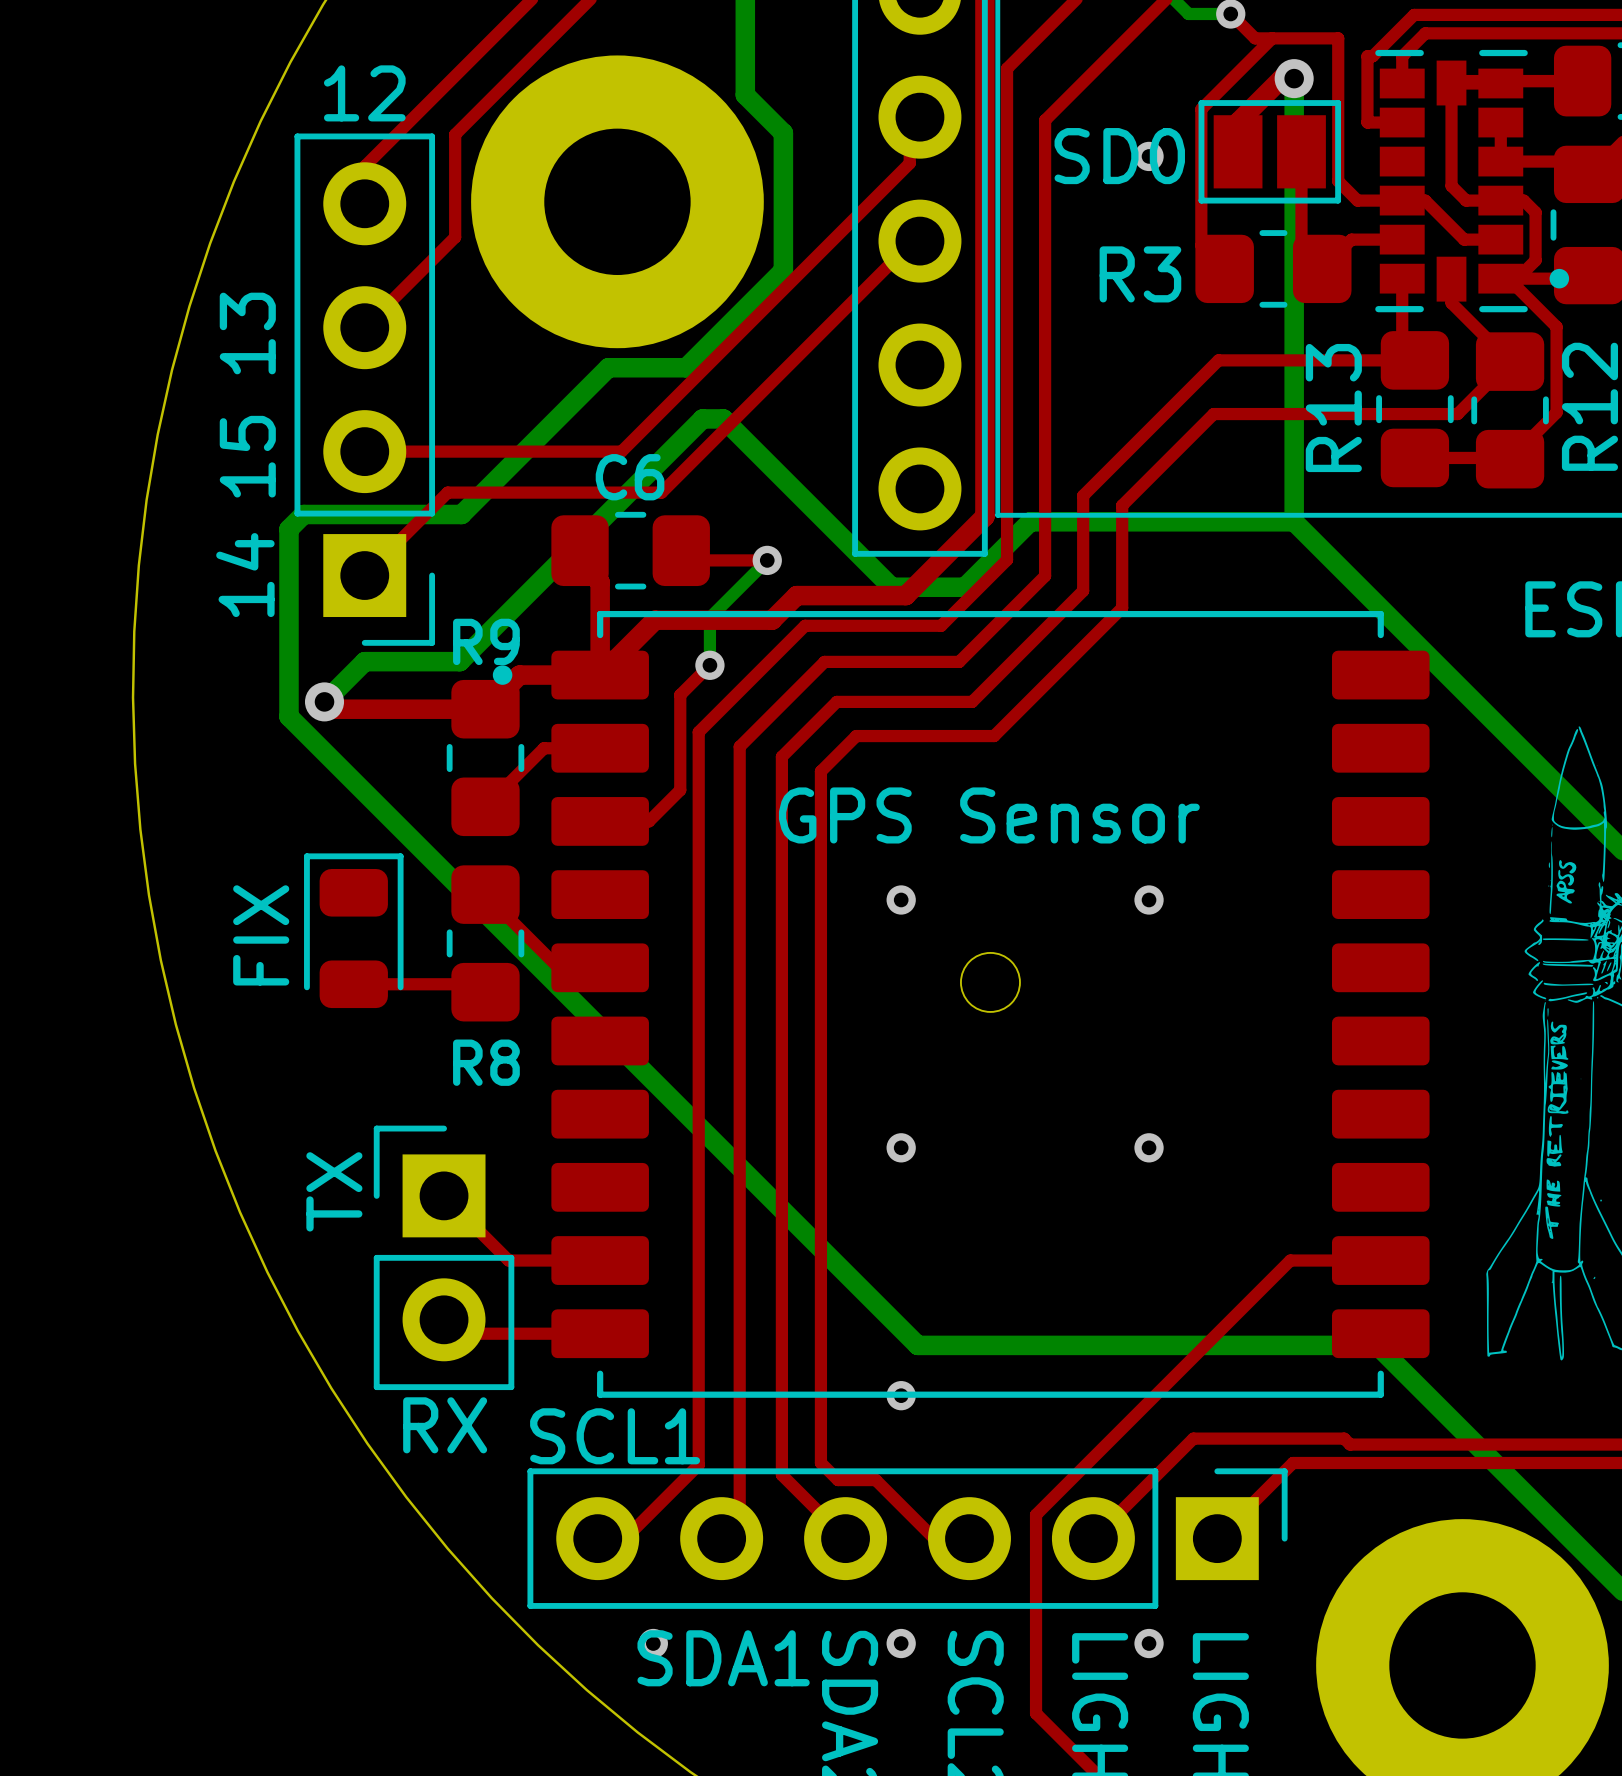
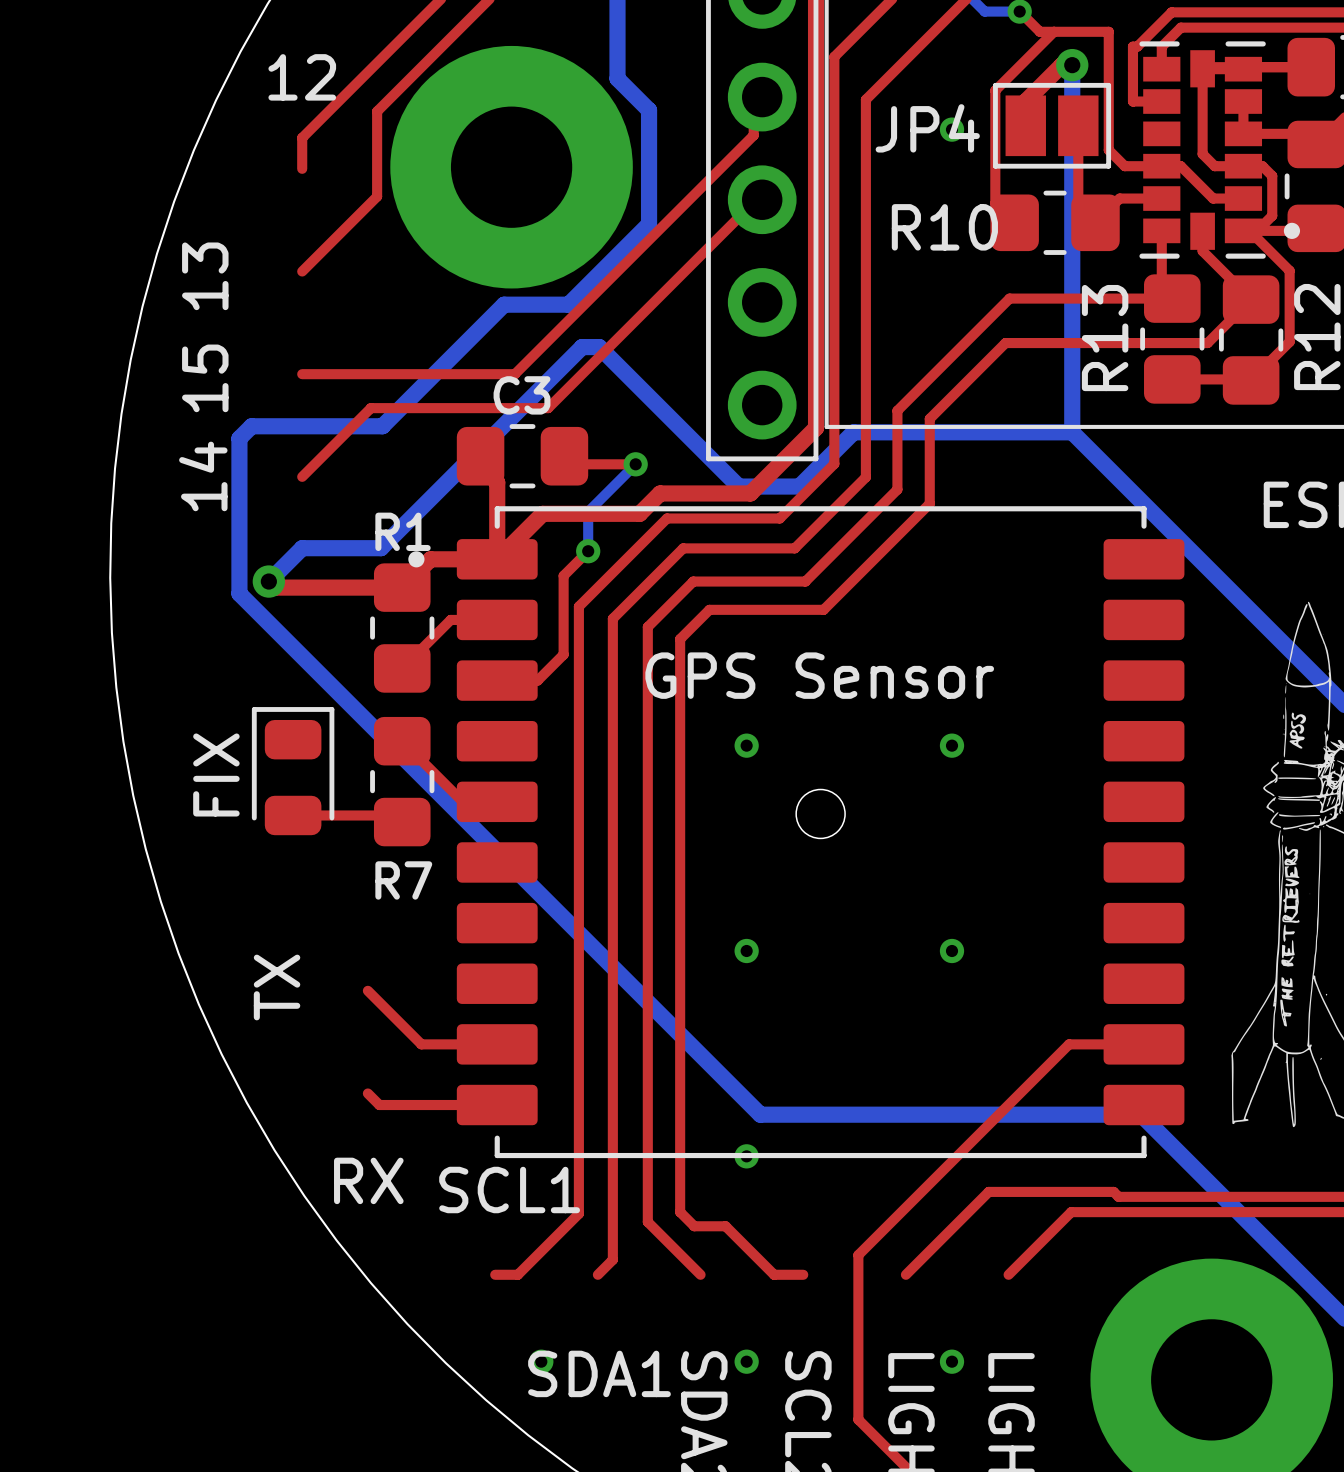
SD0 name: SD0 (1119, 156) -> JP4 (927, 128)
R3 name: R3 (1140, 274) -> R10 (944, 227)
part: (364, 389) -> none
C6 name: C6 (630, 477) -> C3 (522, 395)
R9 name: R9 (486, 641) -> R1 (403, 531)
R8 name: R8 (486, 1062) -> R7 (403, 880)
part: (444, 1257) -> none
part: (907, 1538) -> none

